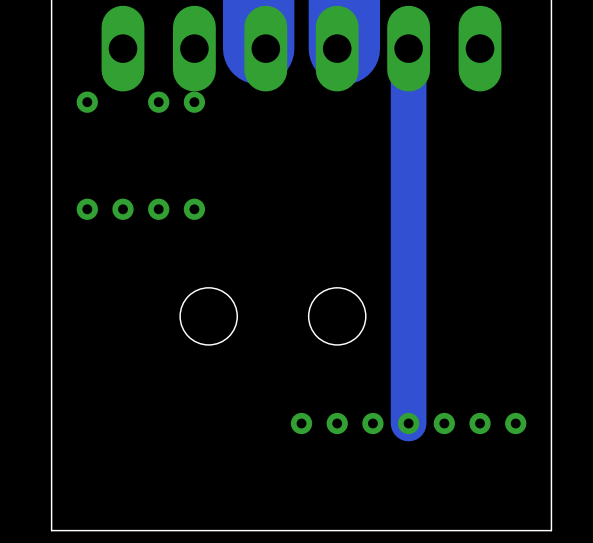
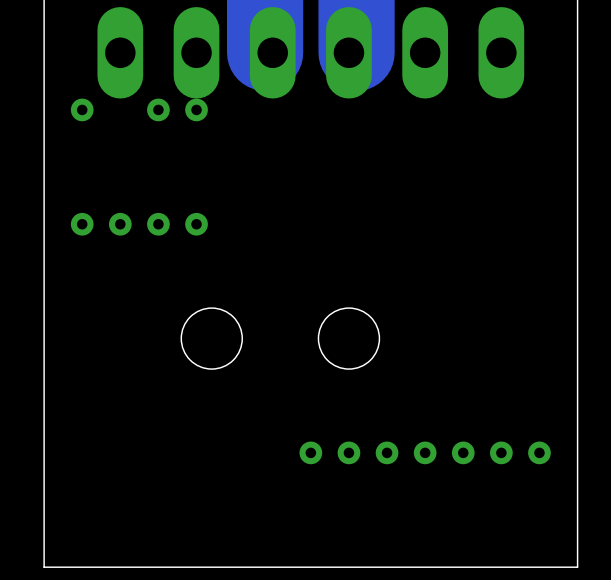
track: (408, 48) (408, 423) -> none

